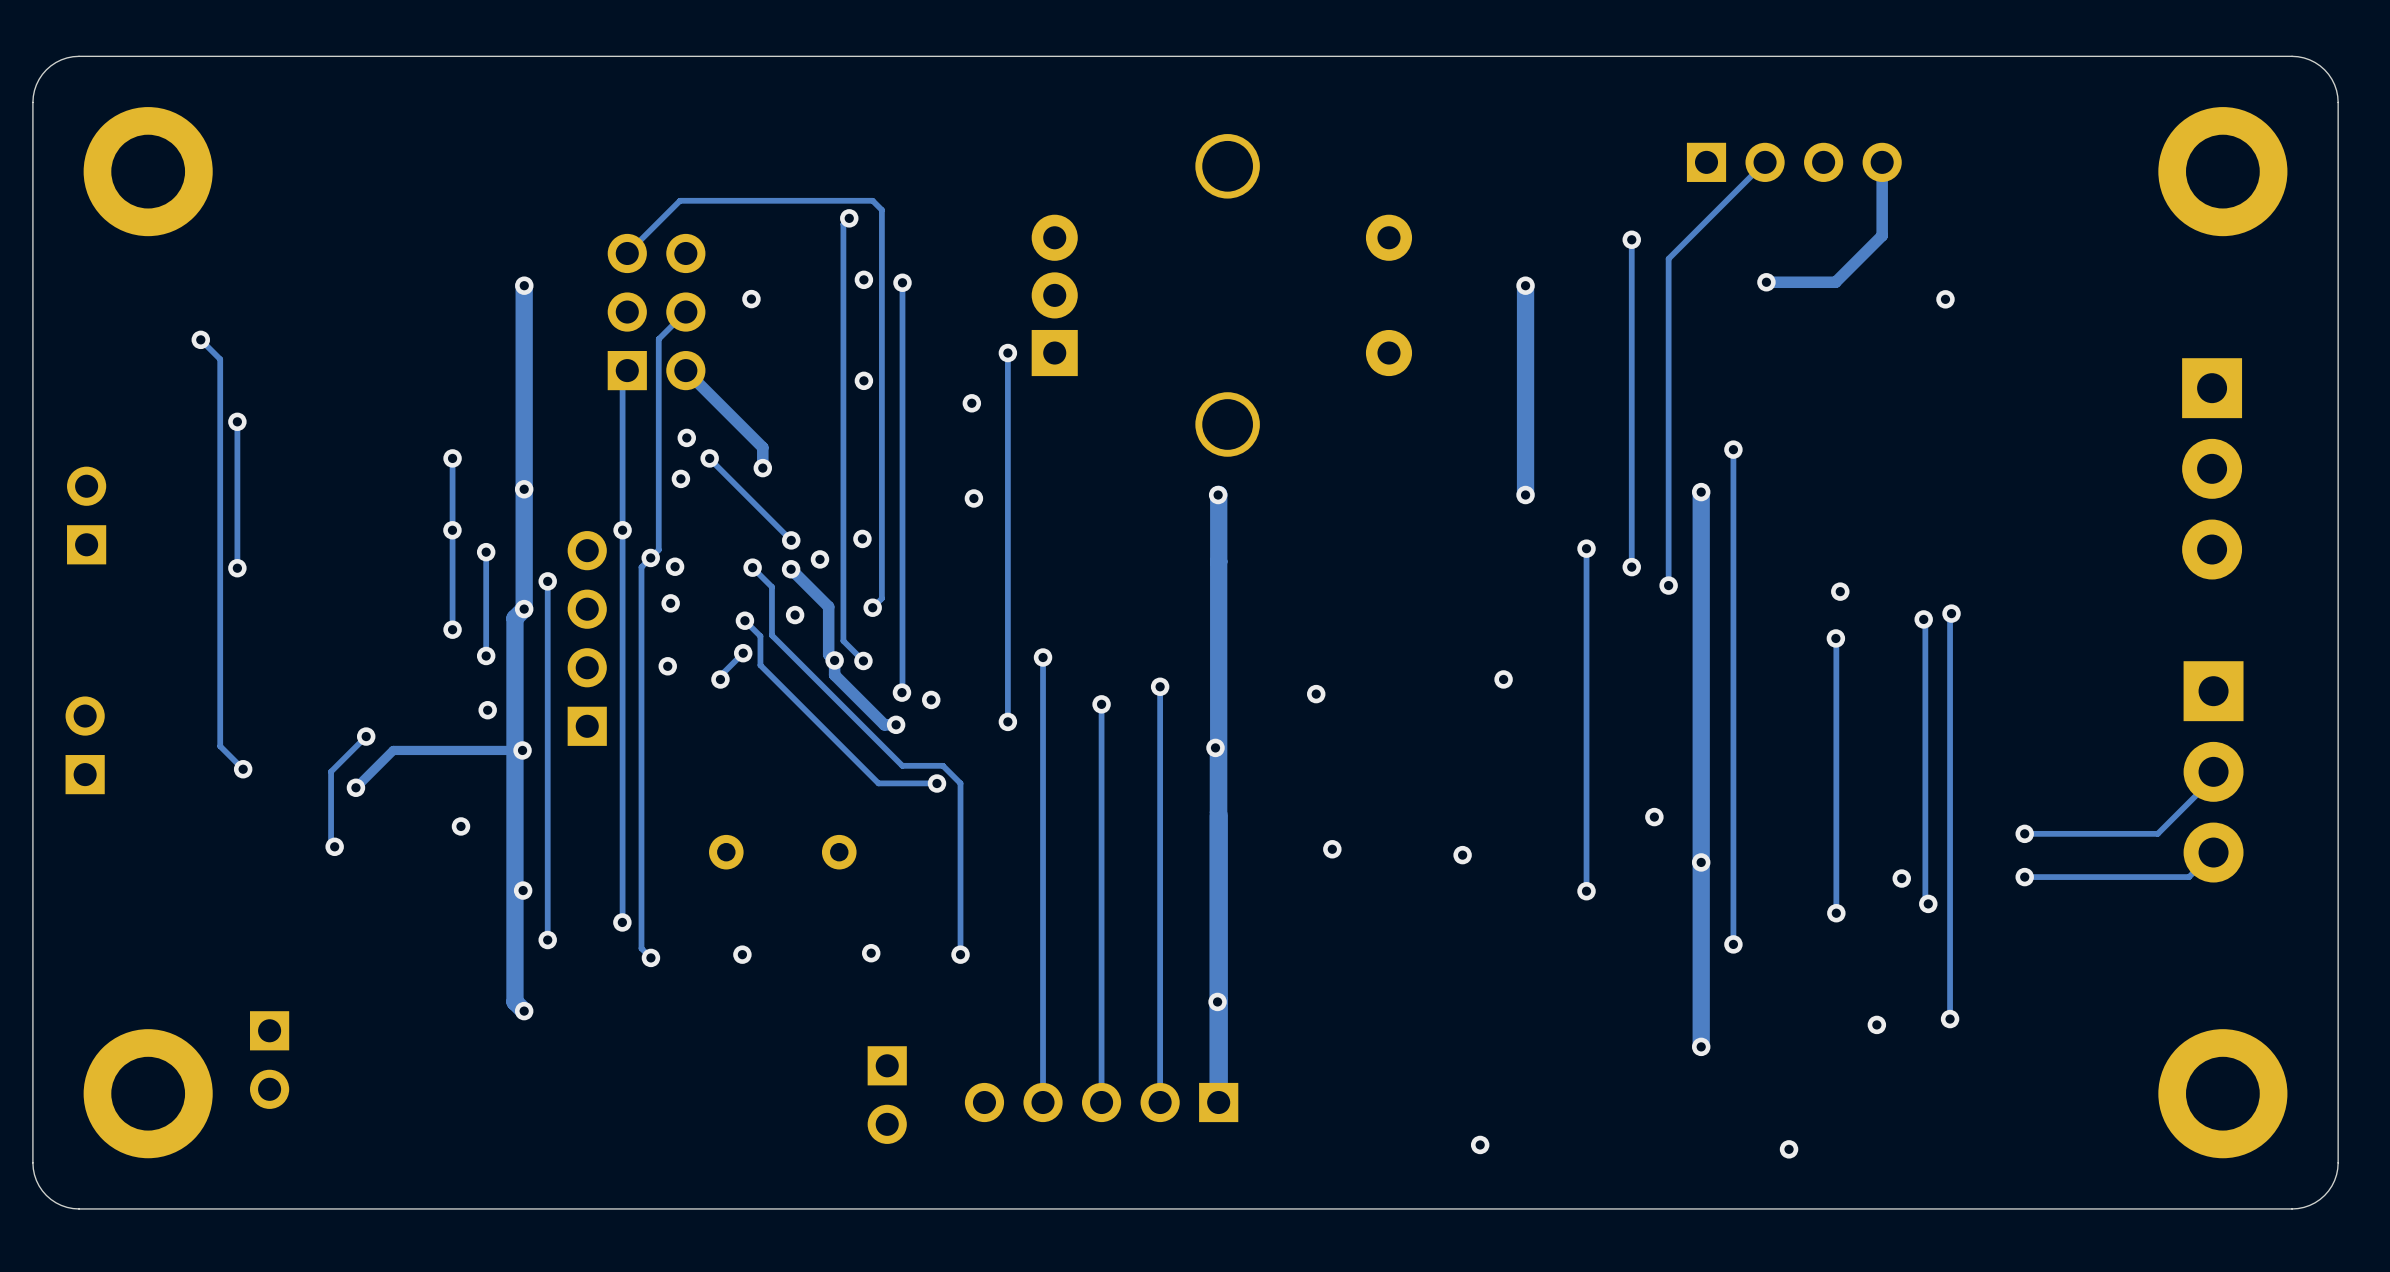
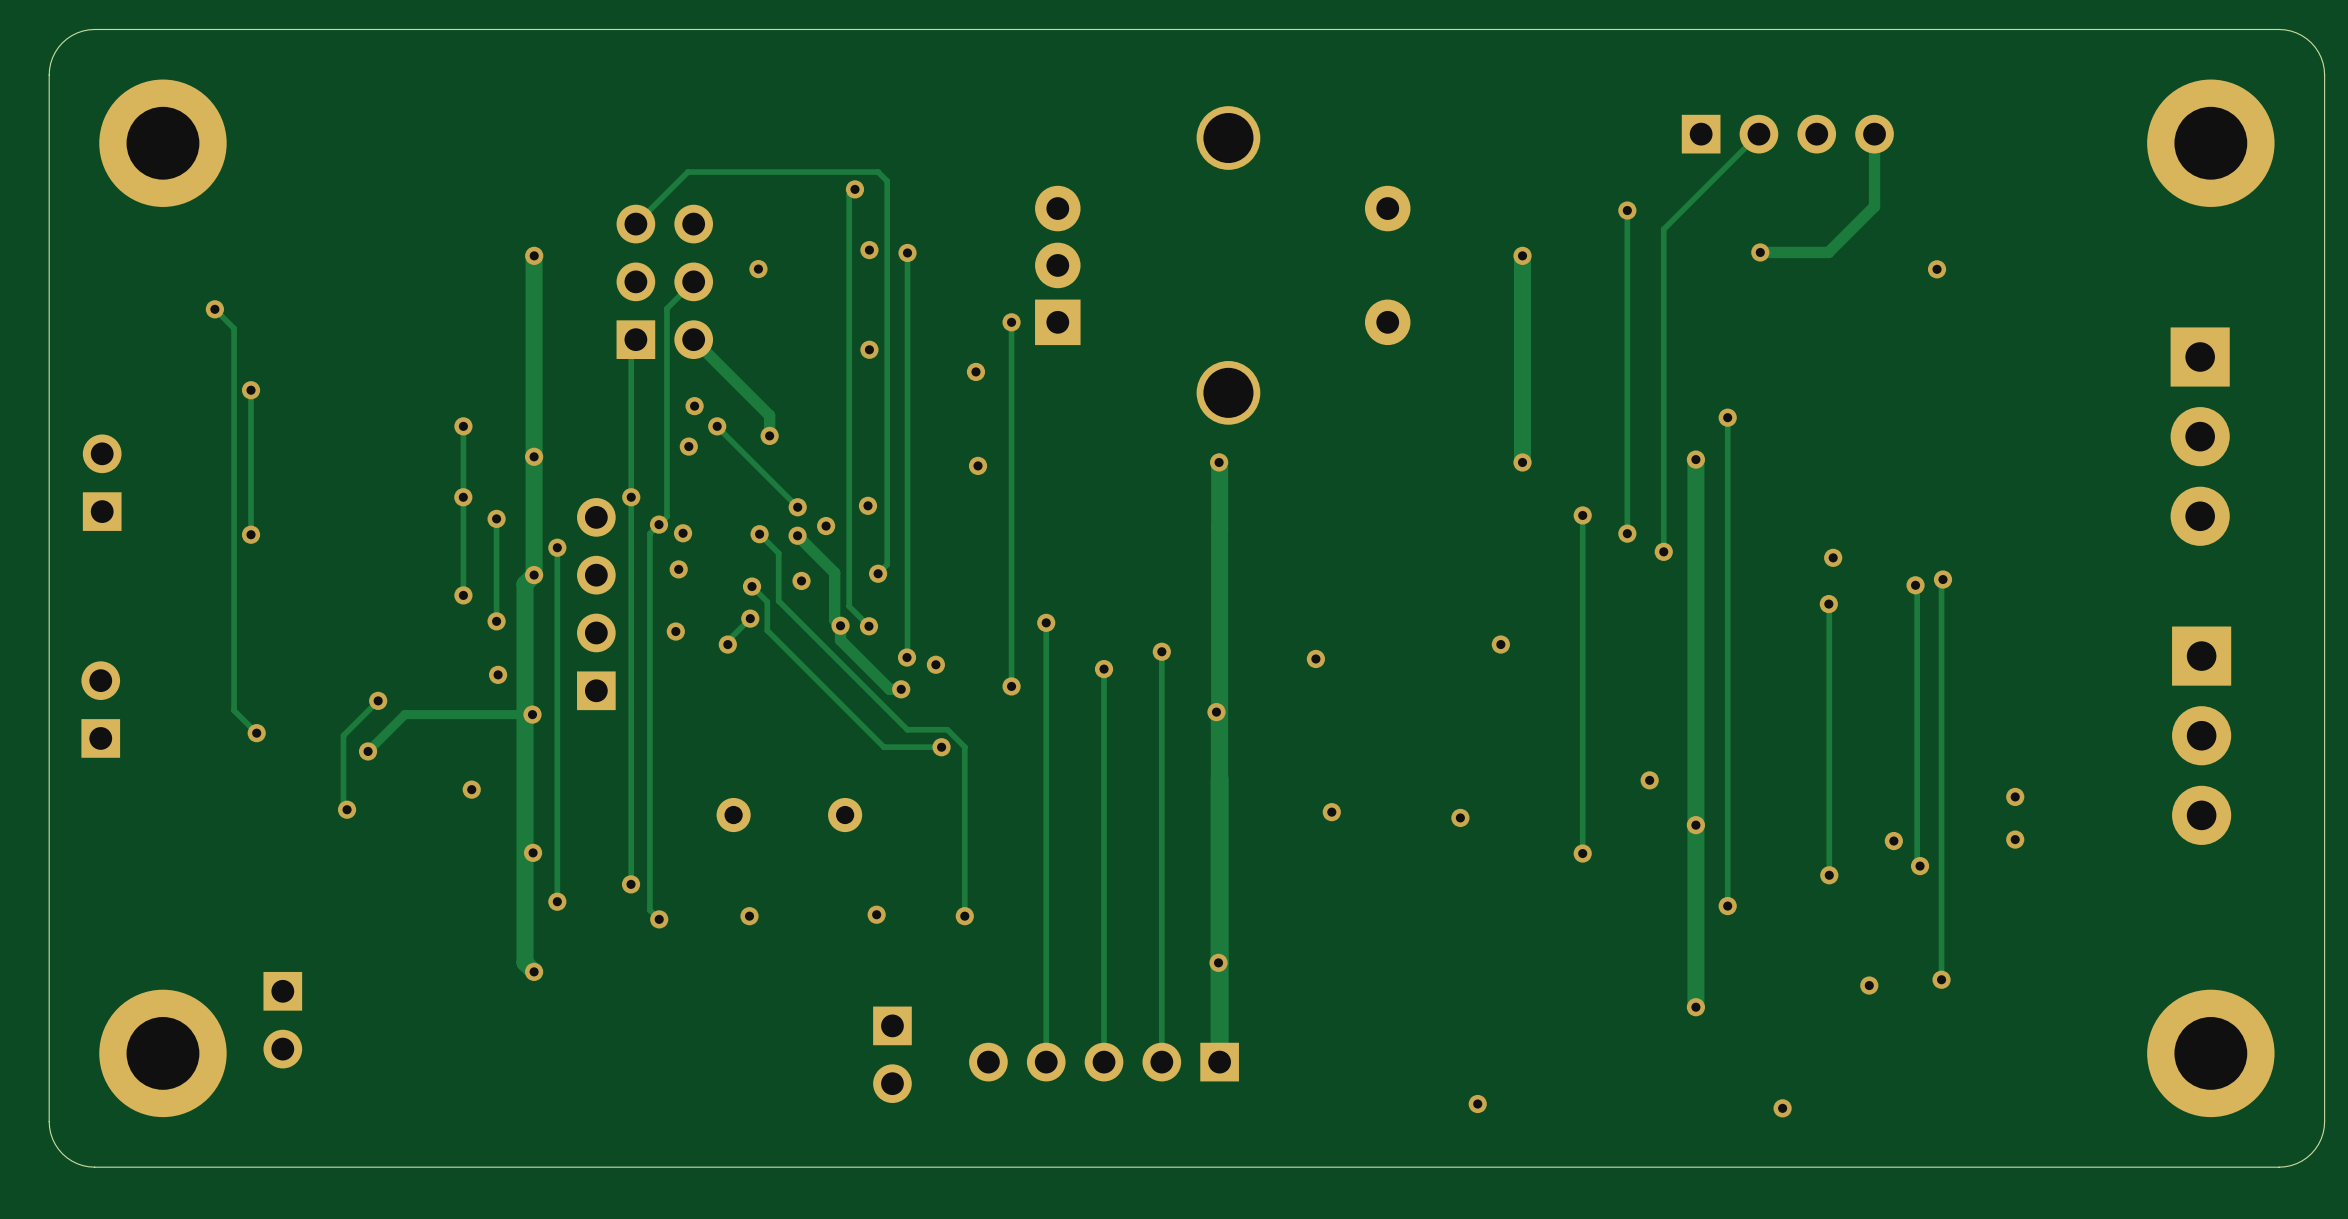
track: (2213, 778) (2157, 833) (2024, 833) -> none
track: (2213, 852) (2189, 877) (2024, 877) -> none

